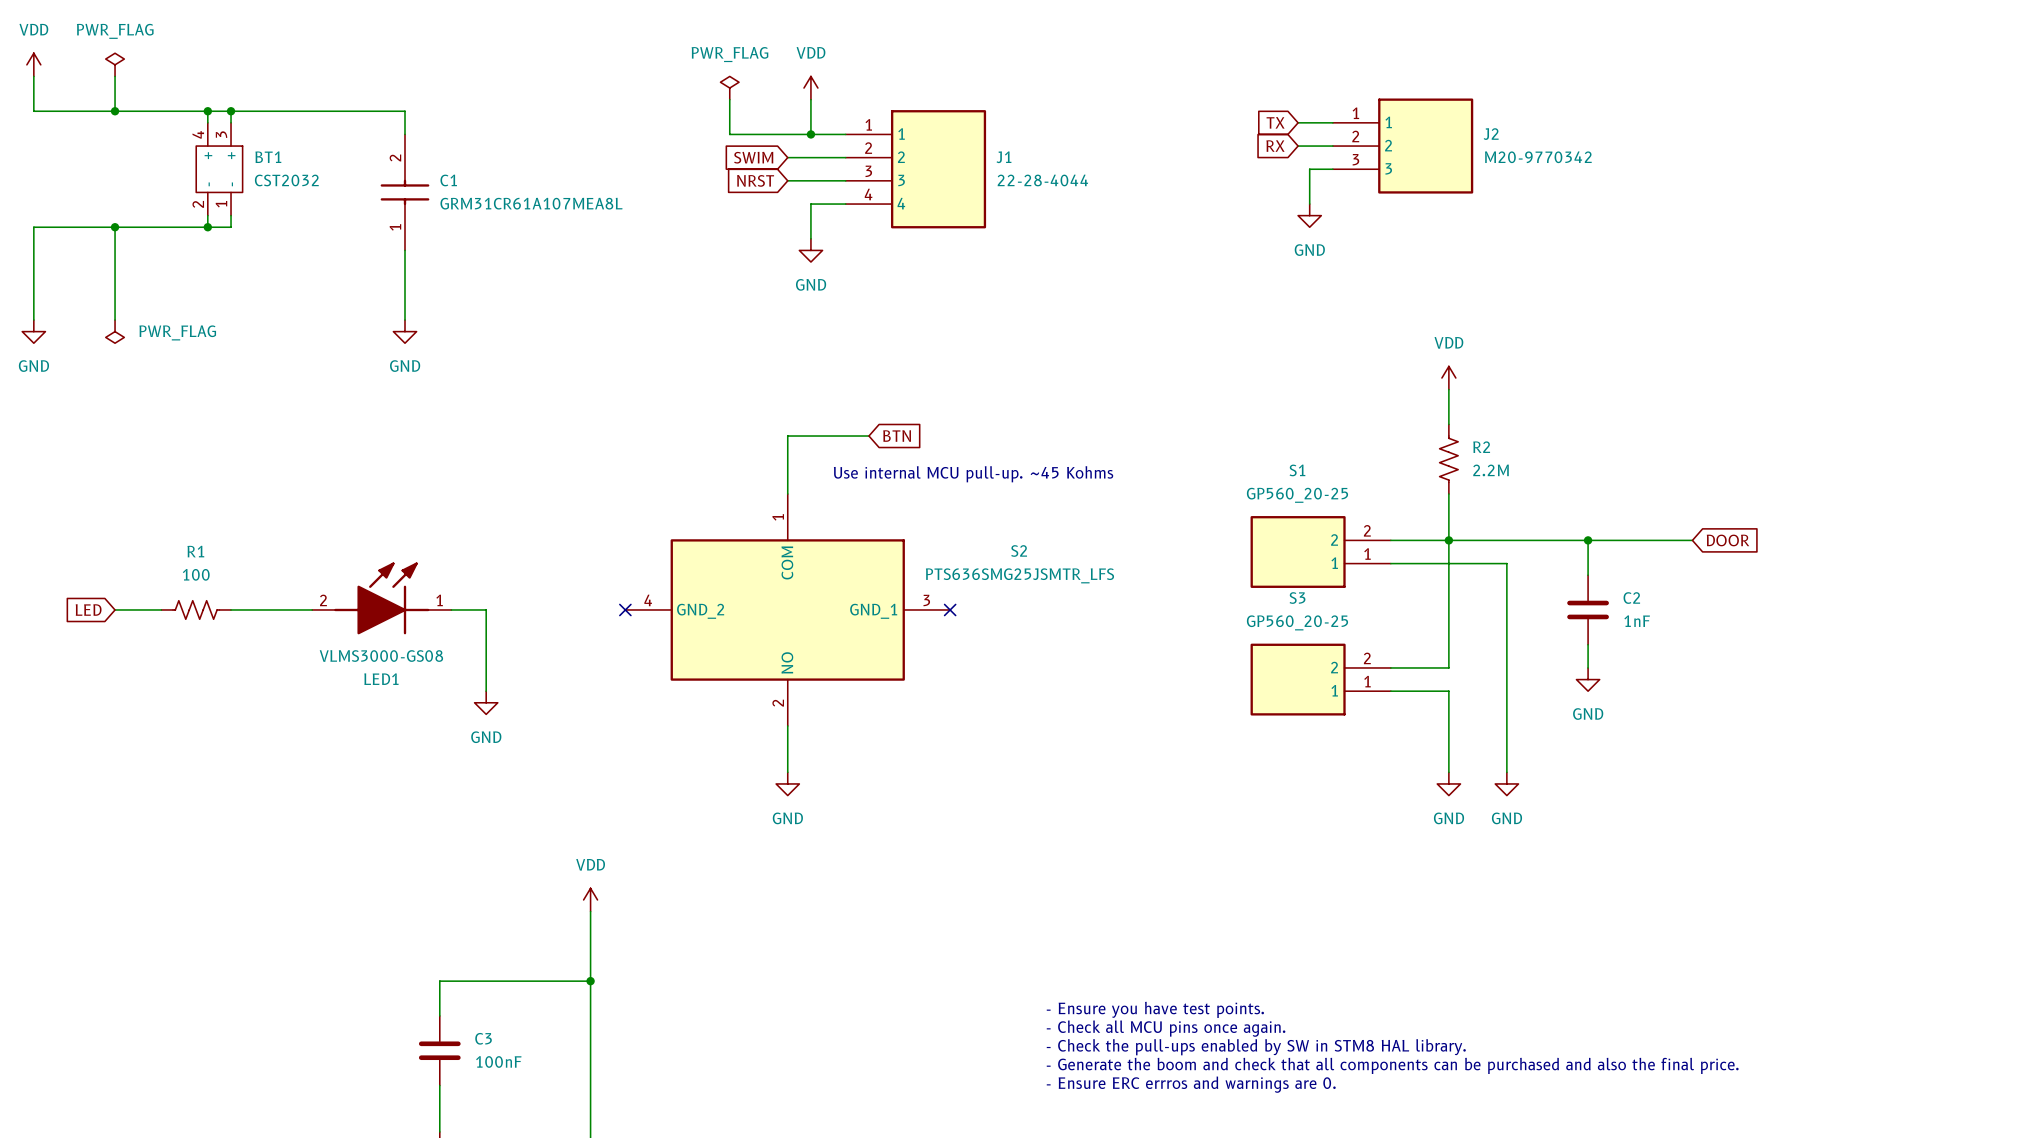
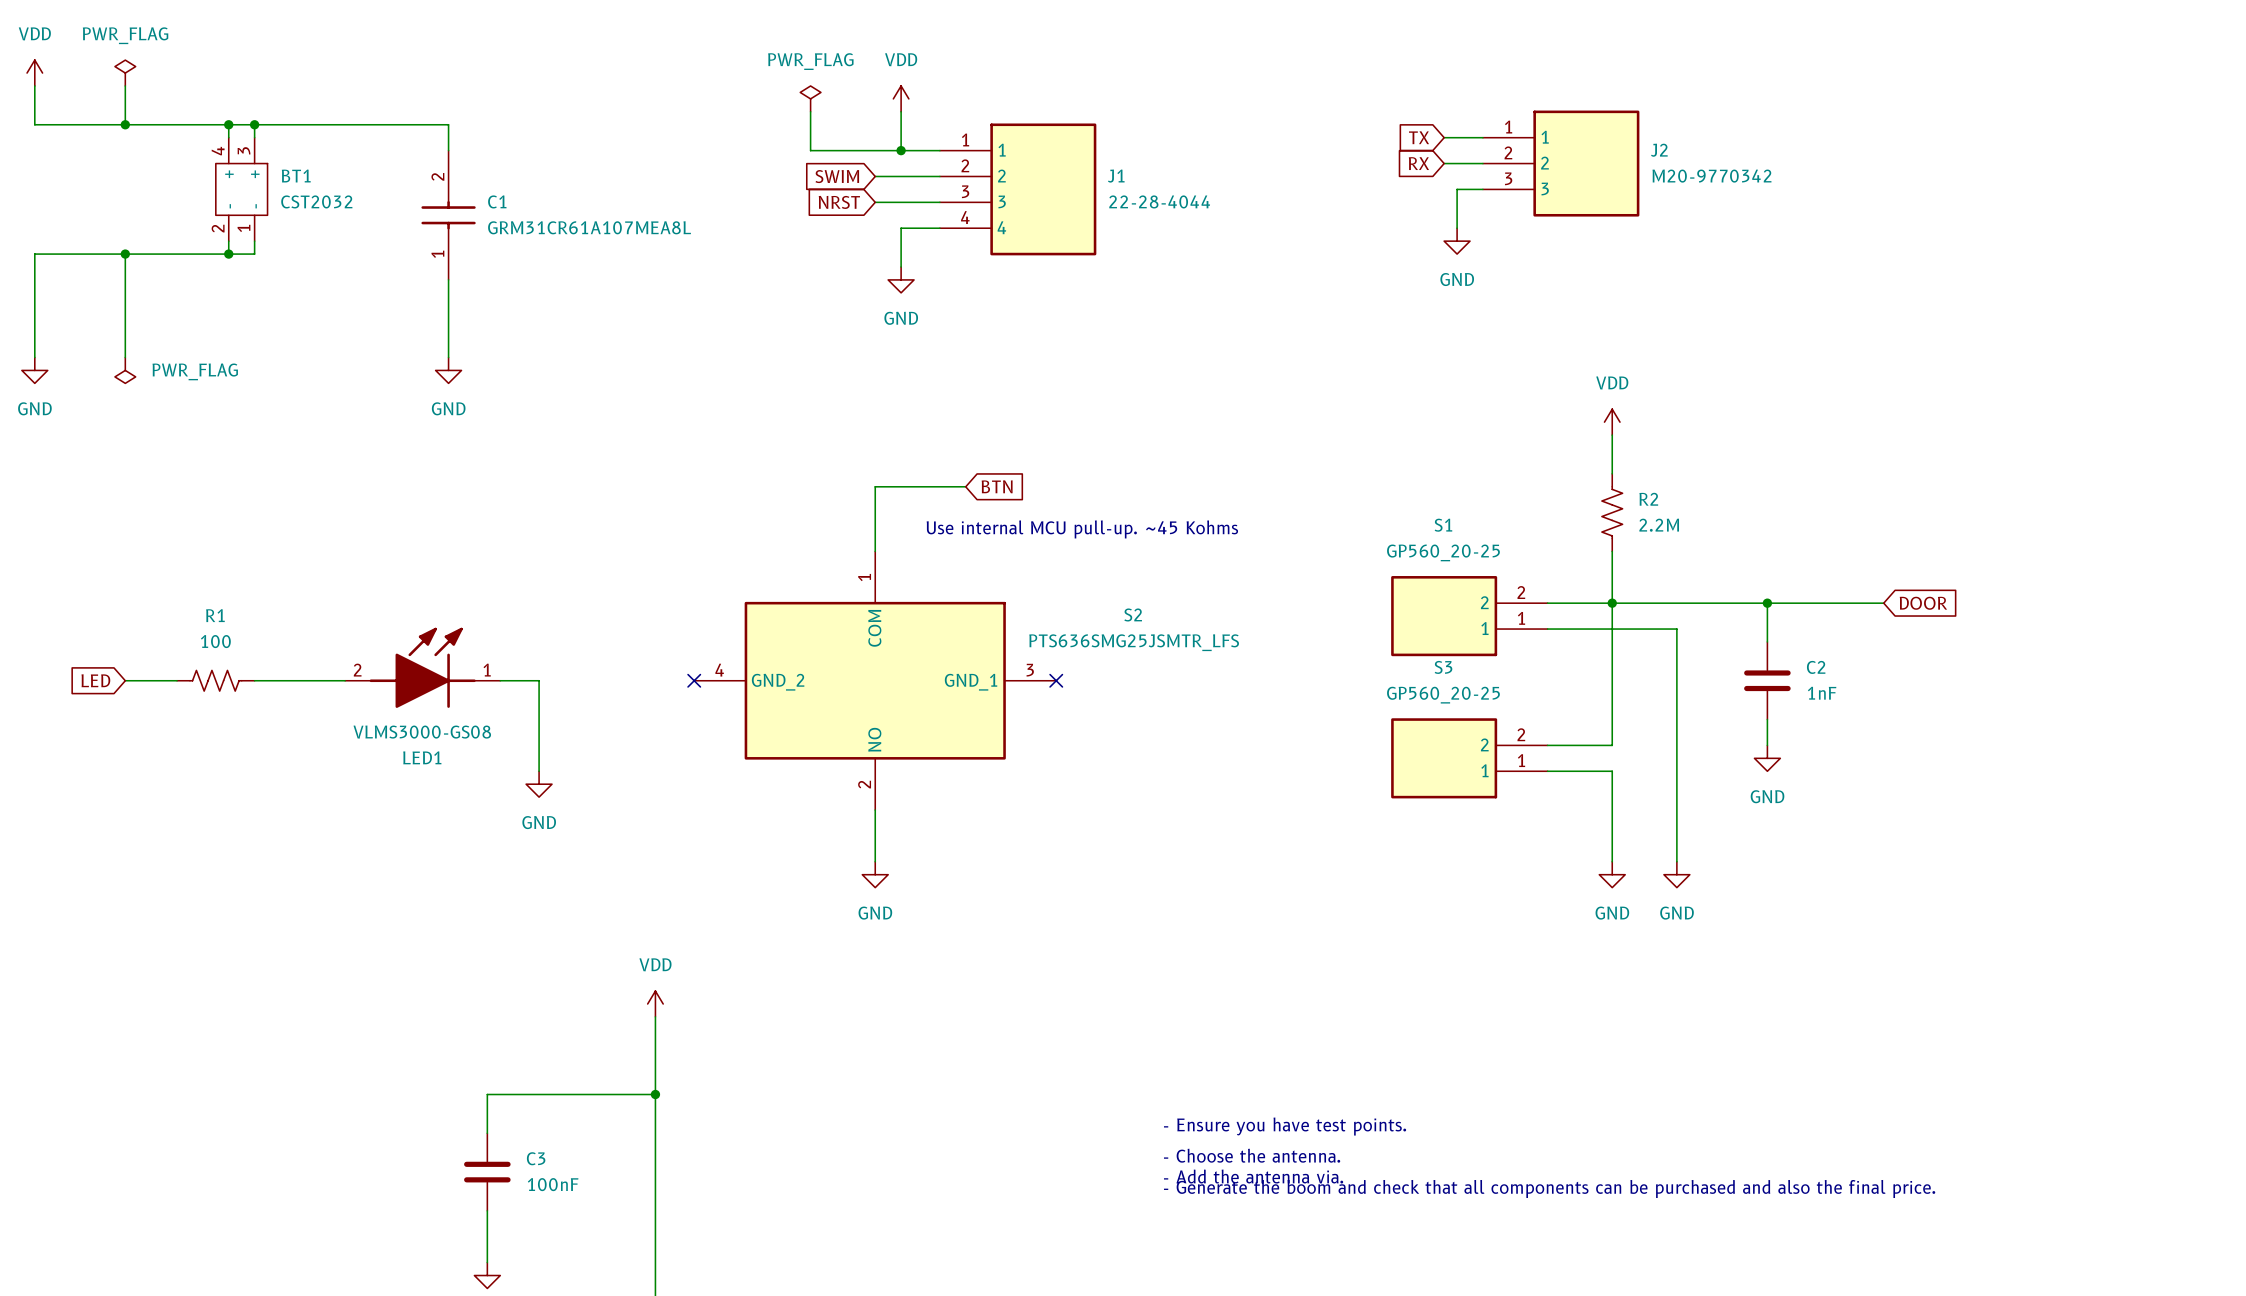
text: - Check all MCU pins once again. (1166, 1028) -> none
text: none -> - Choose the antenna. (1252, 1155)
text: - Check the pull-ups enabled by SW in STM8 HAL library. (1256, 1047) -> none
text: none -> - Add the antenna via. (1253, 1176)
text: - Ensure ERC errros and warnings are 0. (1191, 1084) -> none

